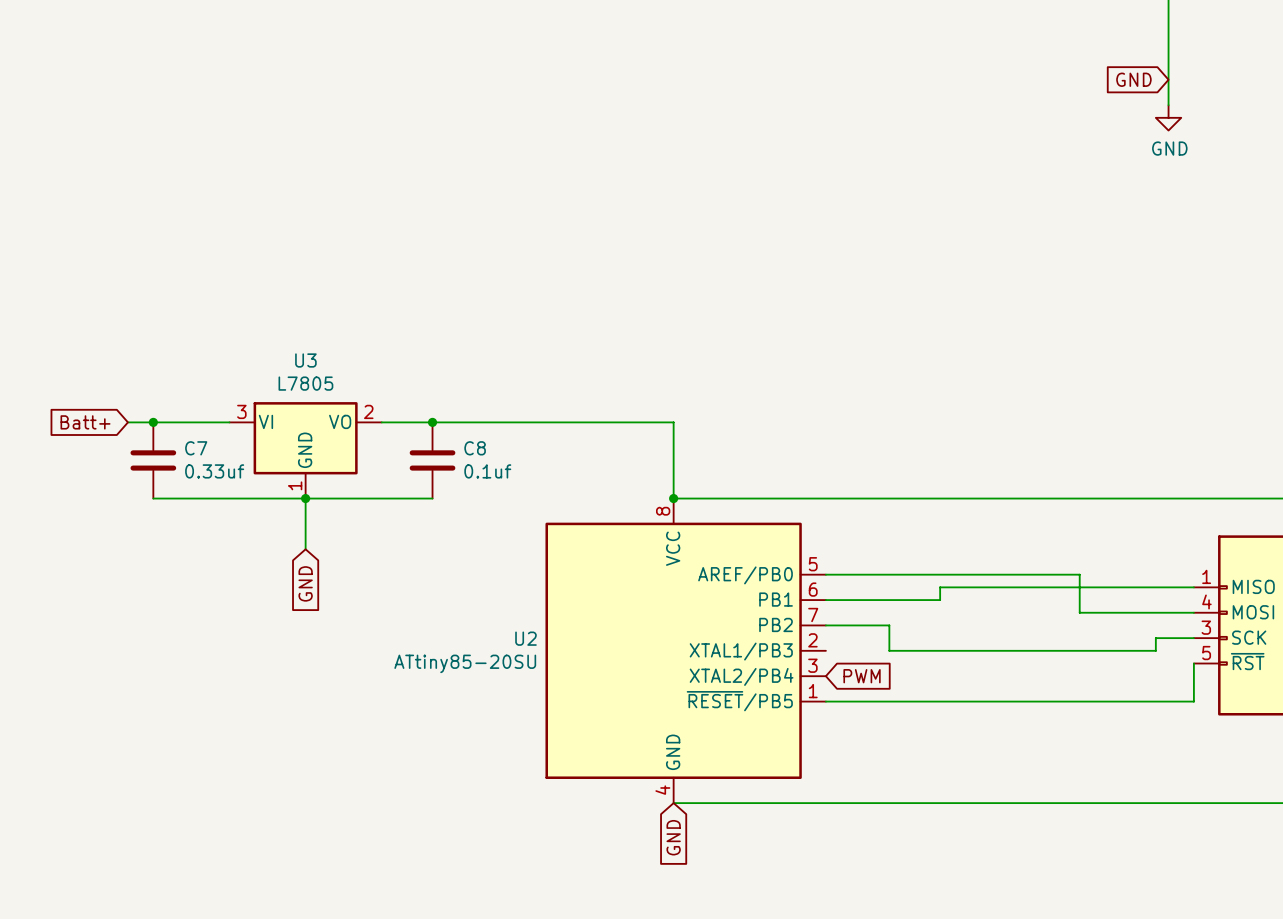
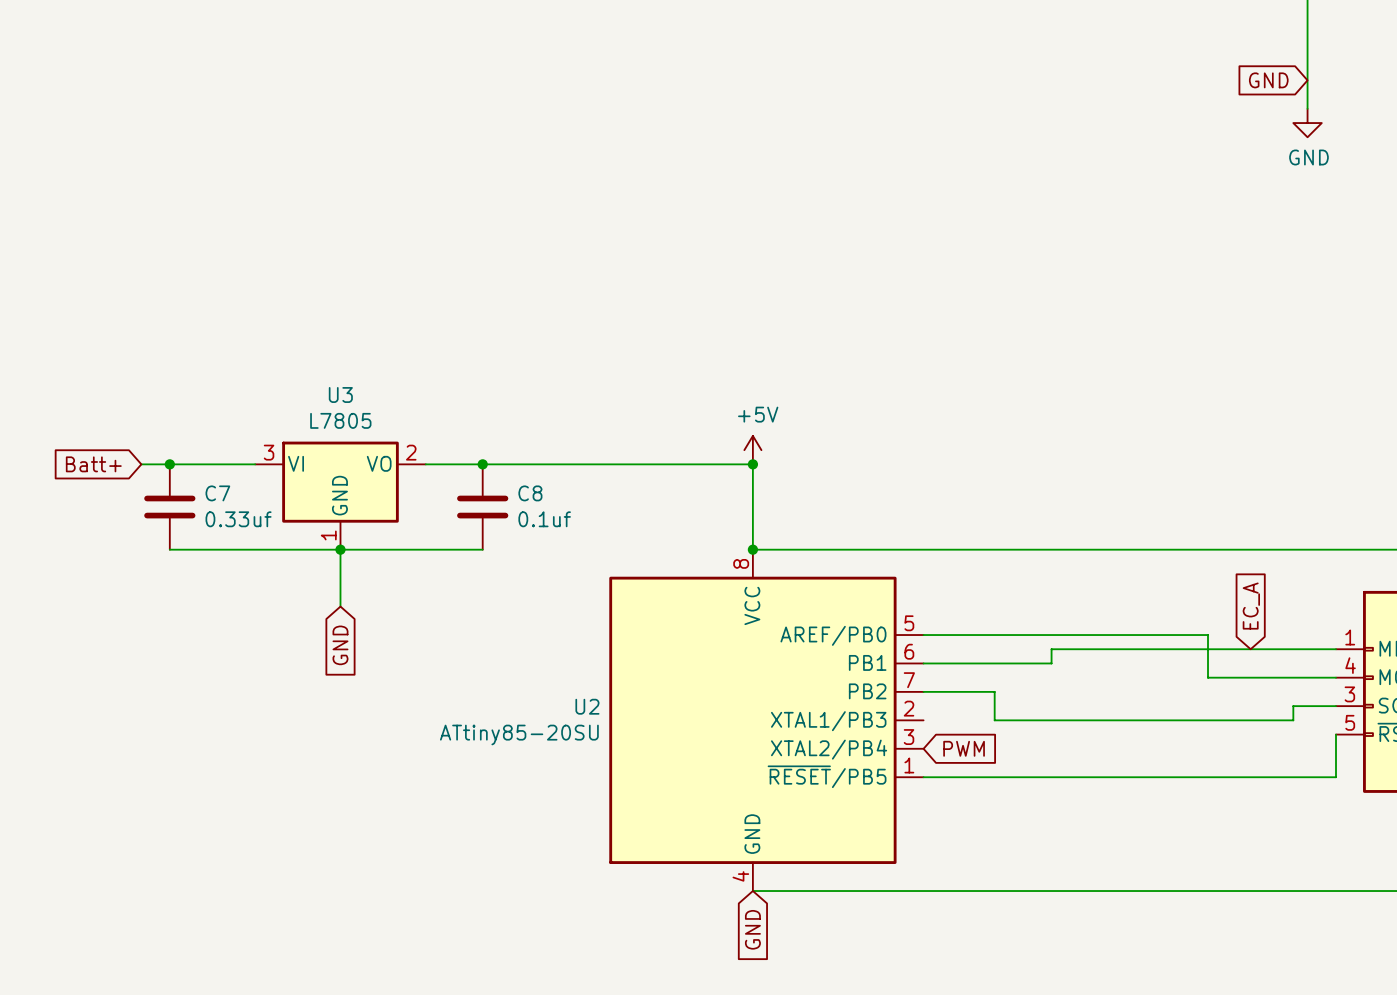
power symbol: none -> +5V (752, 450)
junction: none -> (752, 464)
global label: none -> EC_A (1251, 606)

